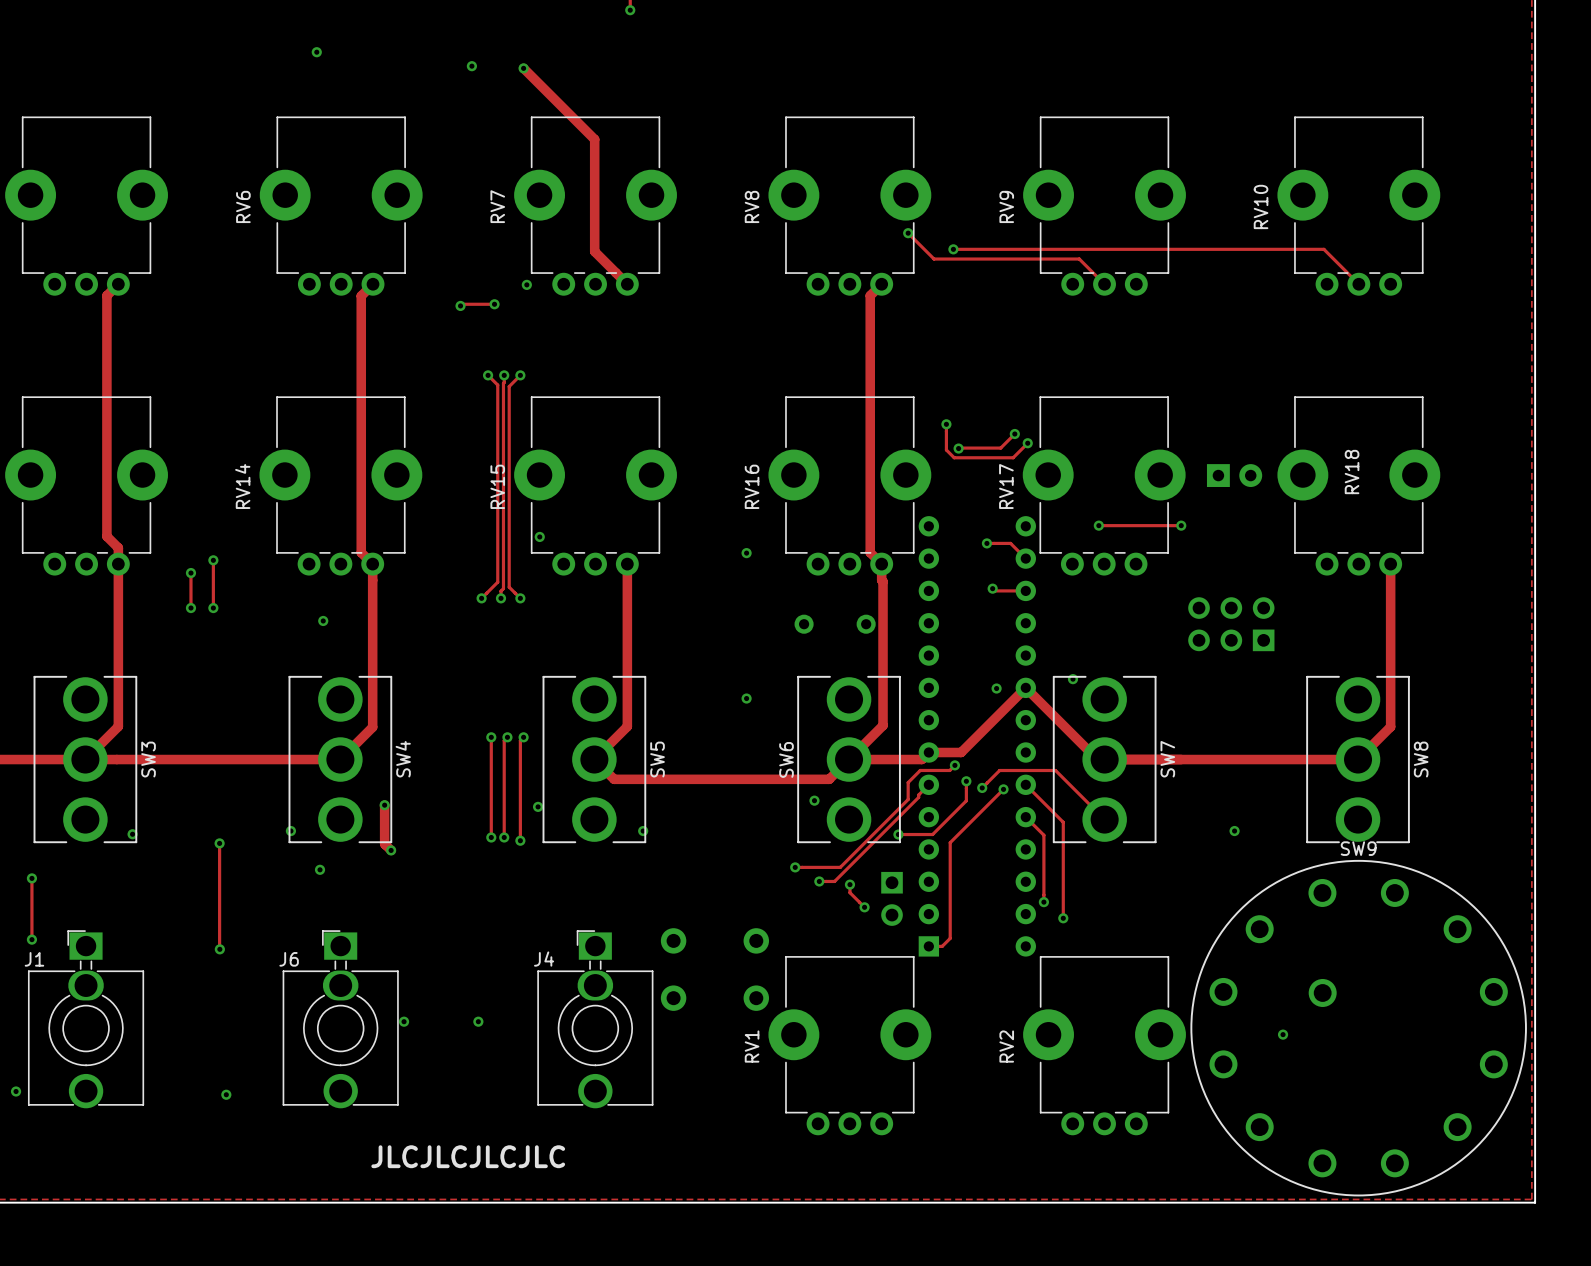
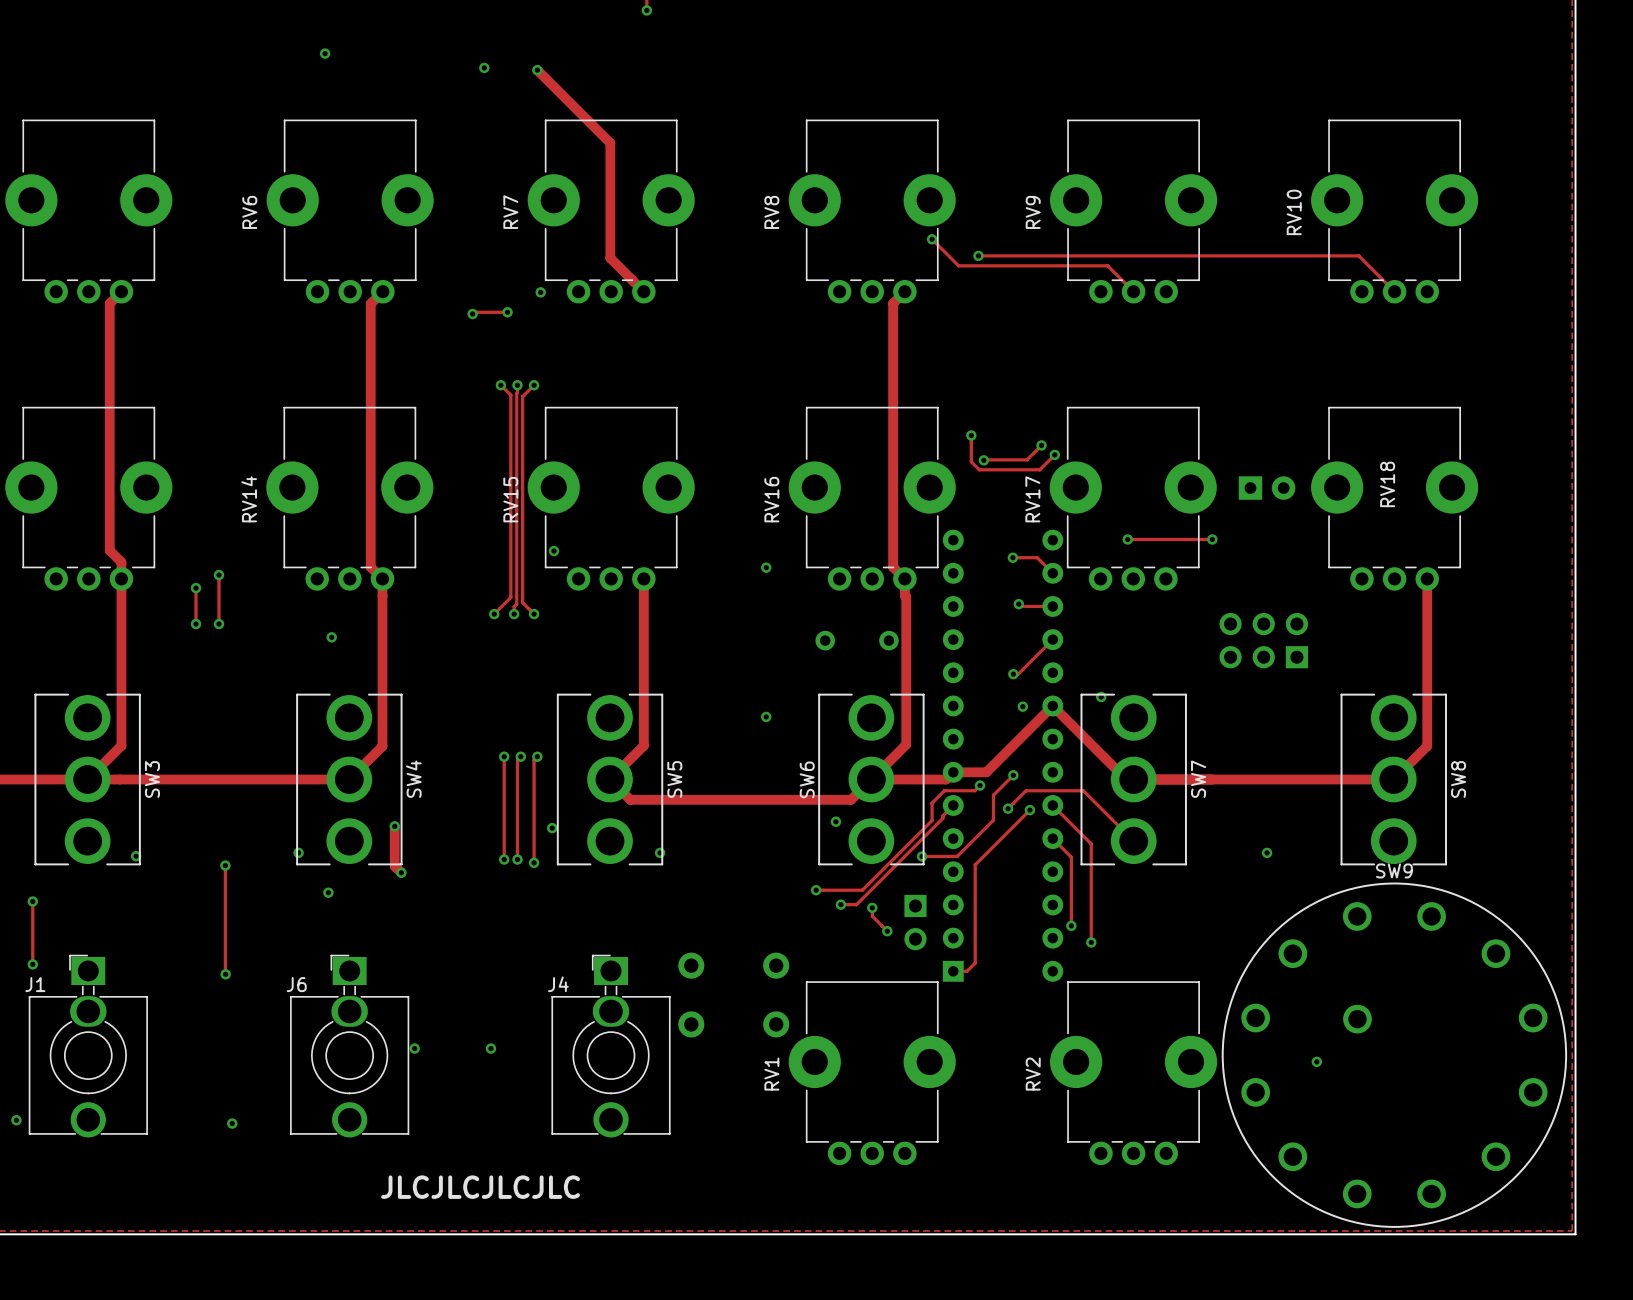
track: none -> (1052, 639) (1018, 674) (1013, 674)
via: none -> (1013, 674)
track: (966, 781) (966, 800) -> (1013, 775) (993, 795) (993, 820) (991, 821)
via position: (966, 781) -> (1013, 775)

